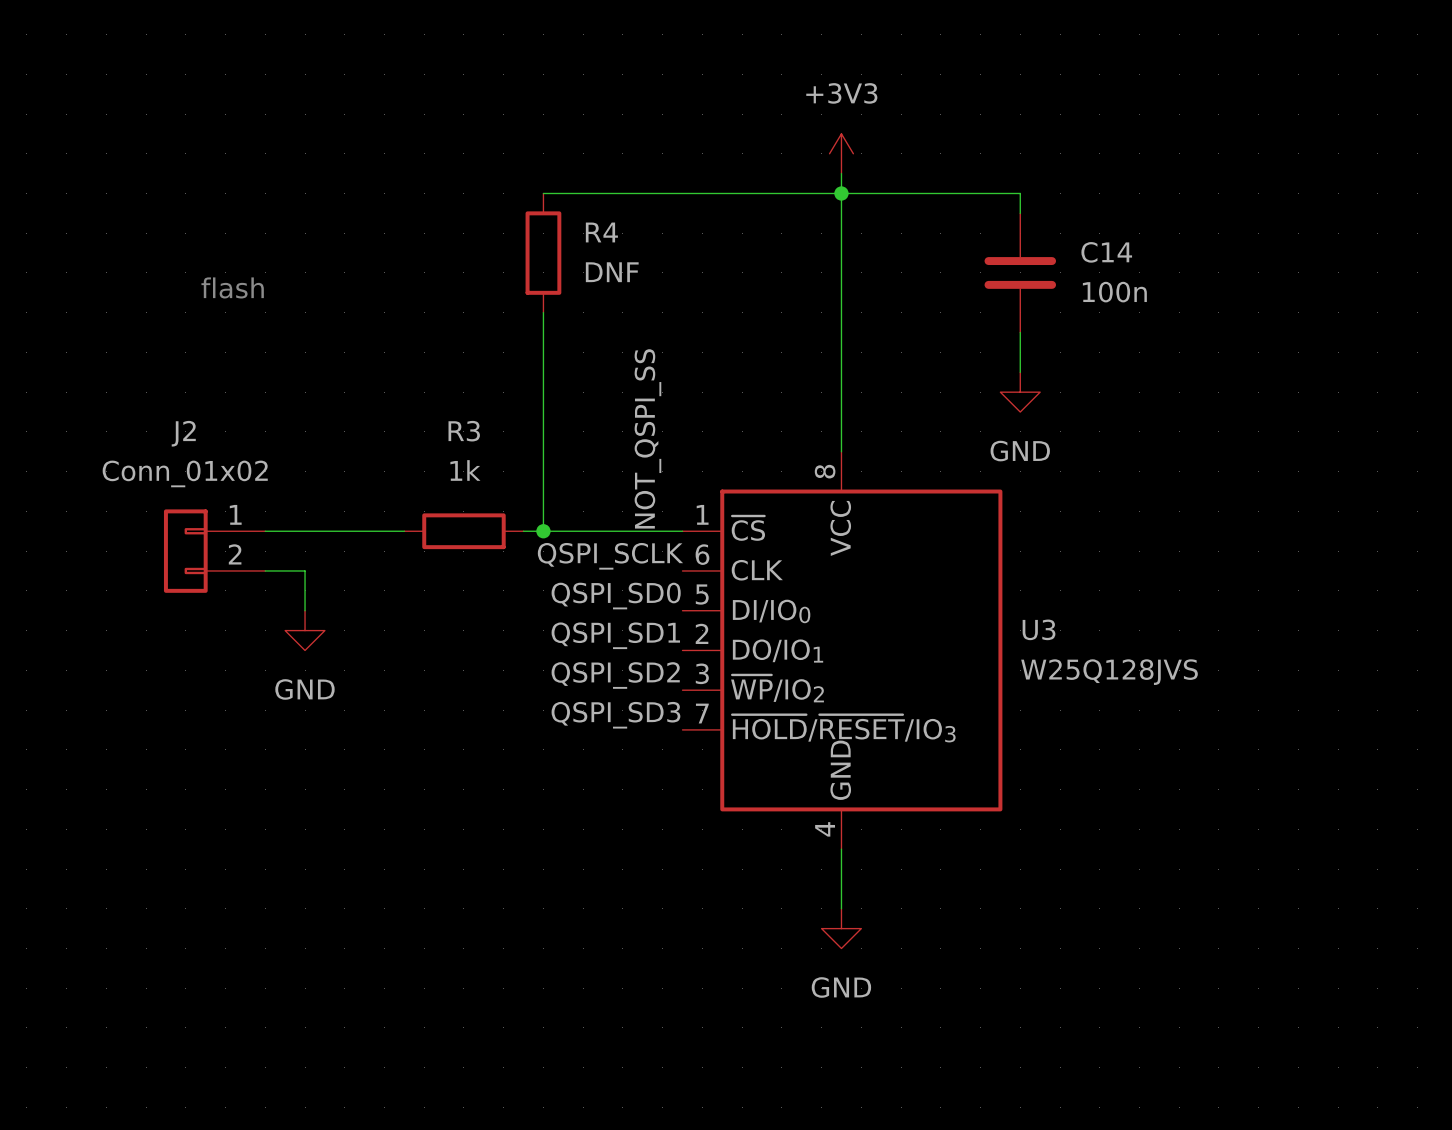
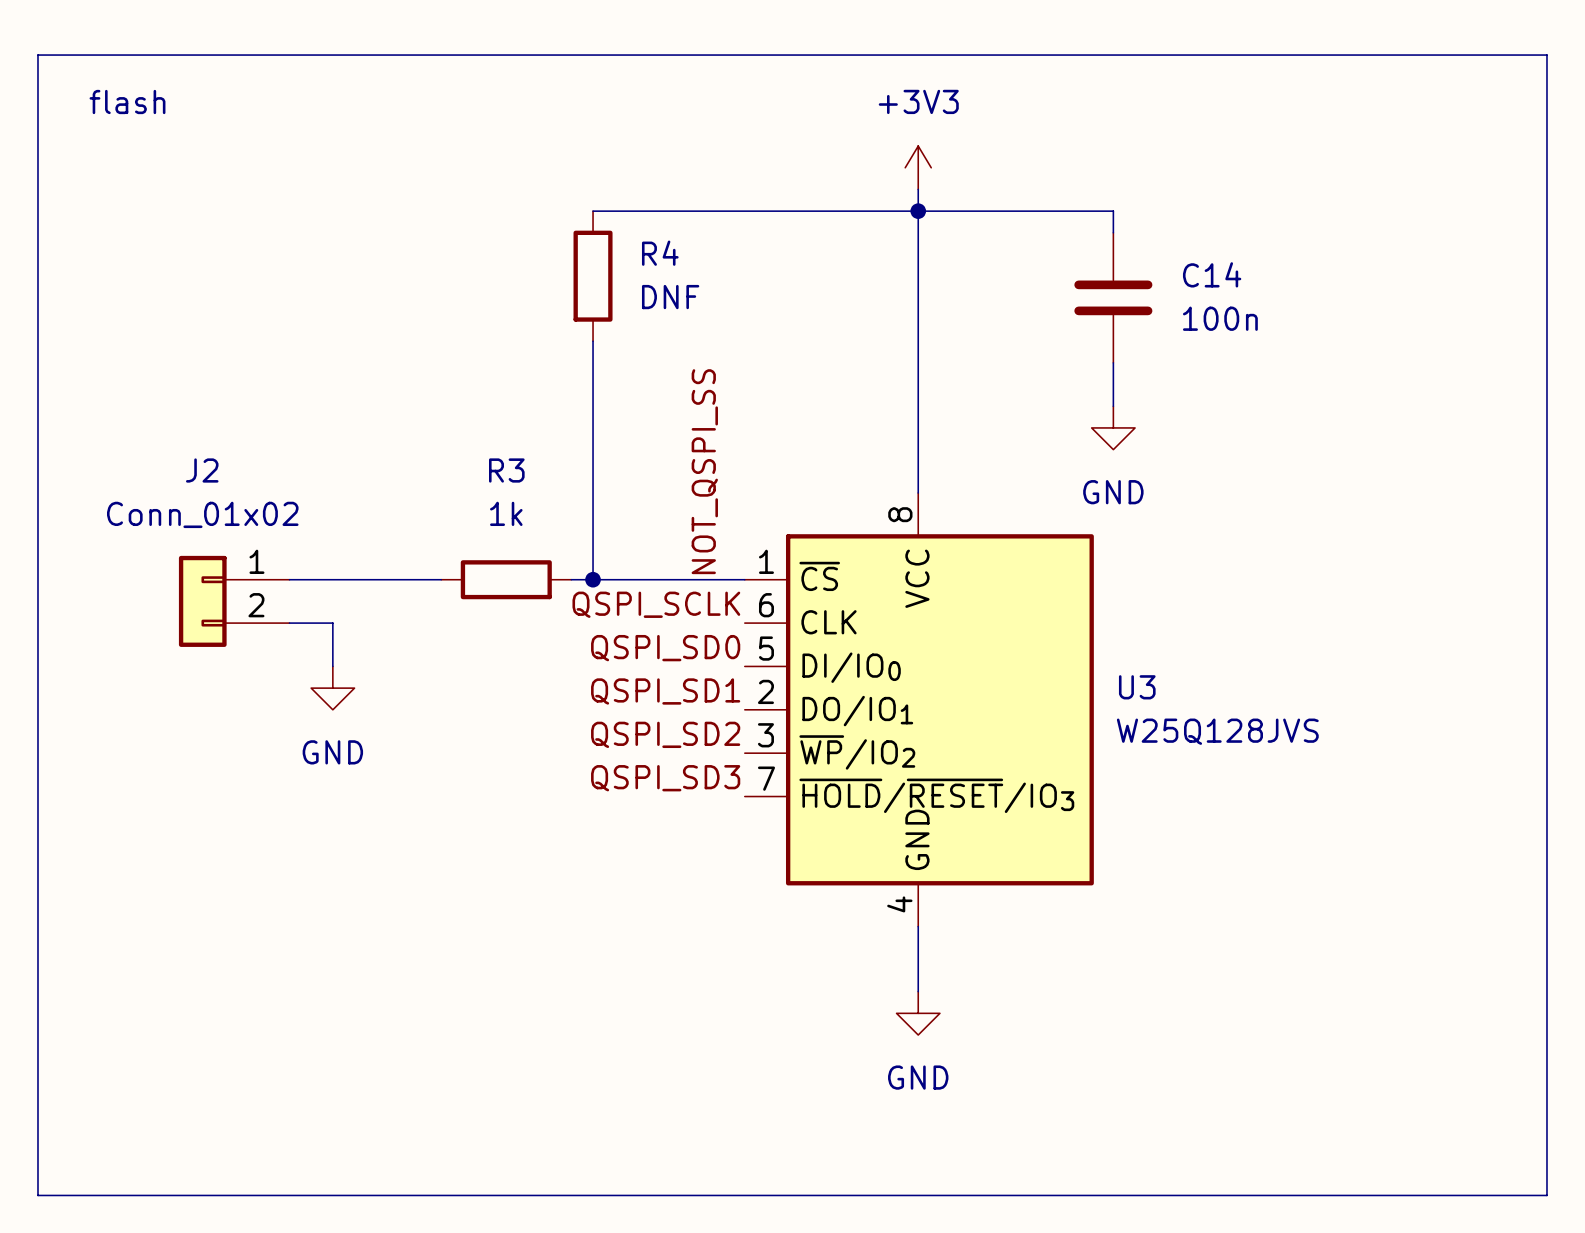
line: none -> (37, 55) (1546, 55) (1546, 1195) (37, 1195) (37, 55)
text position: flash (232, 287) -> flash (127, 101)

